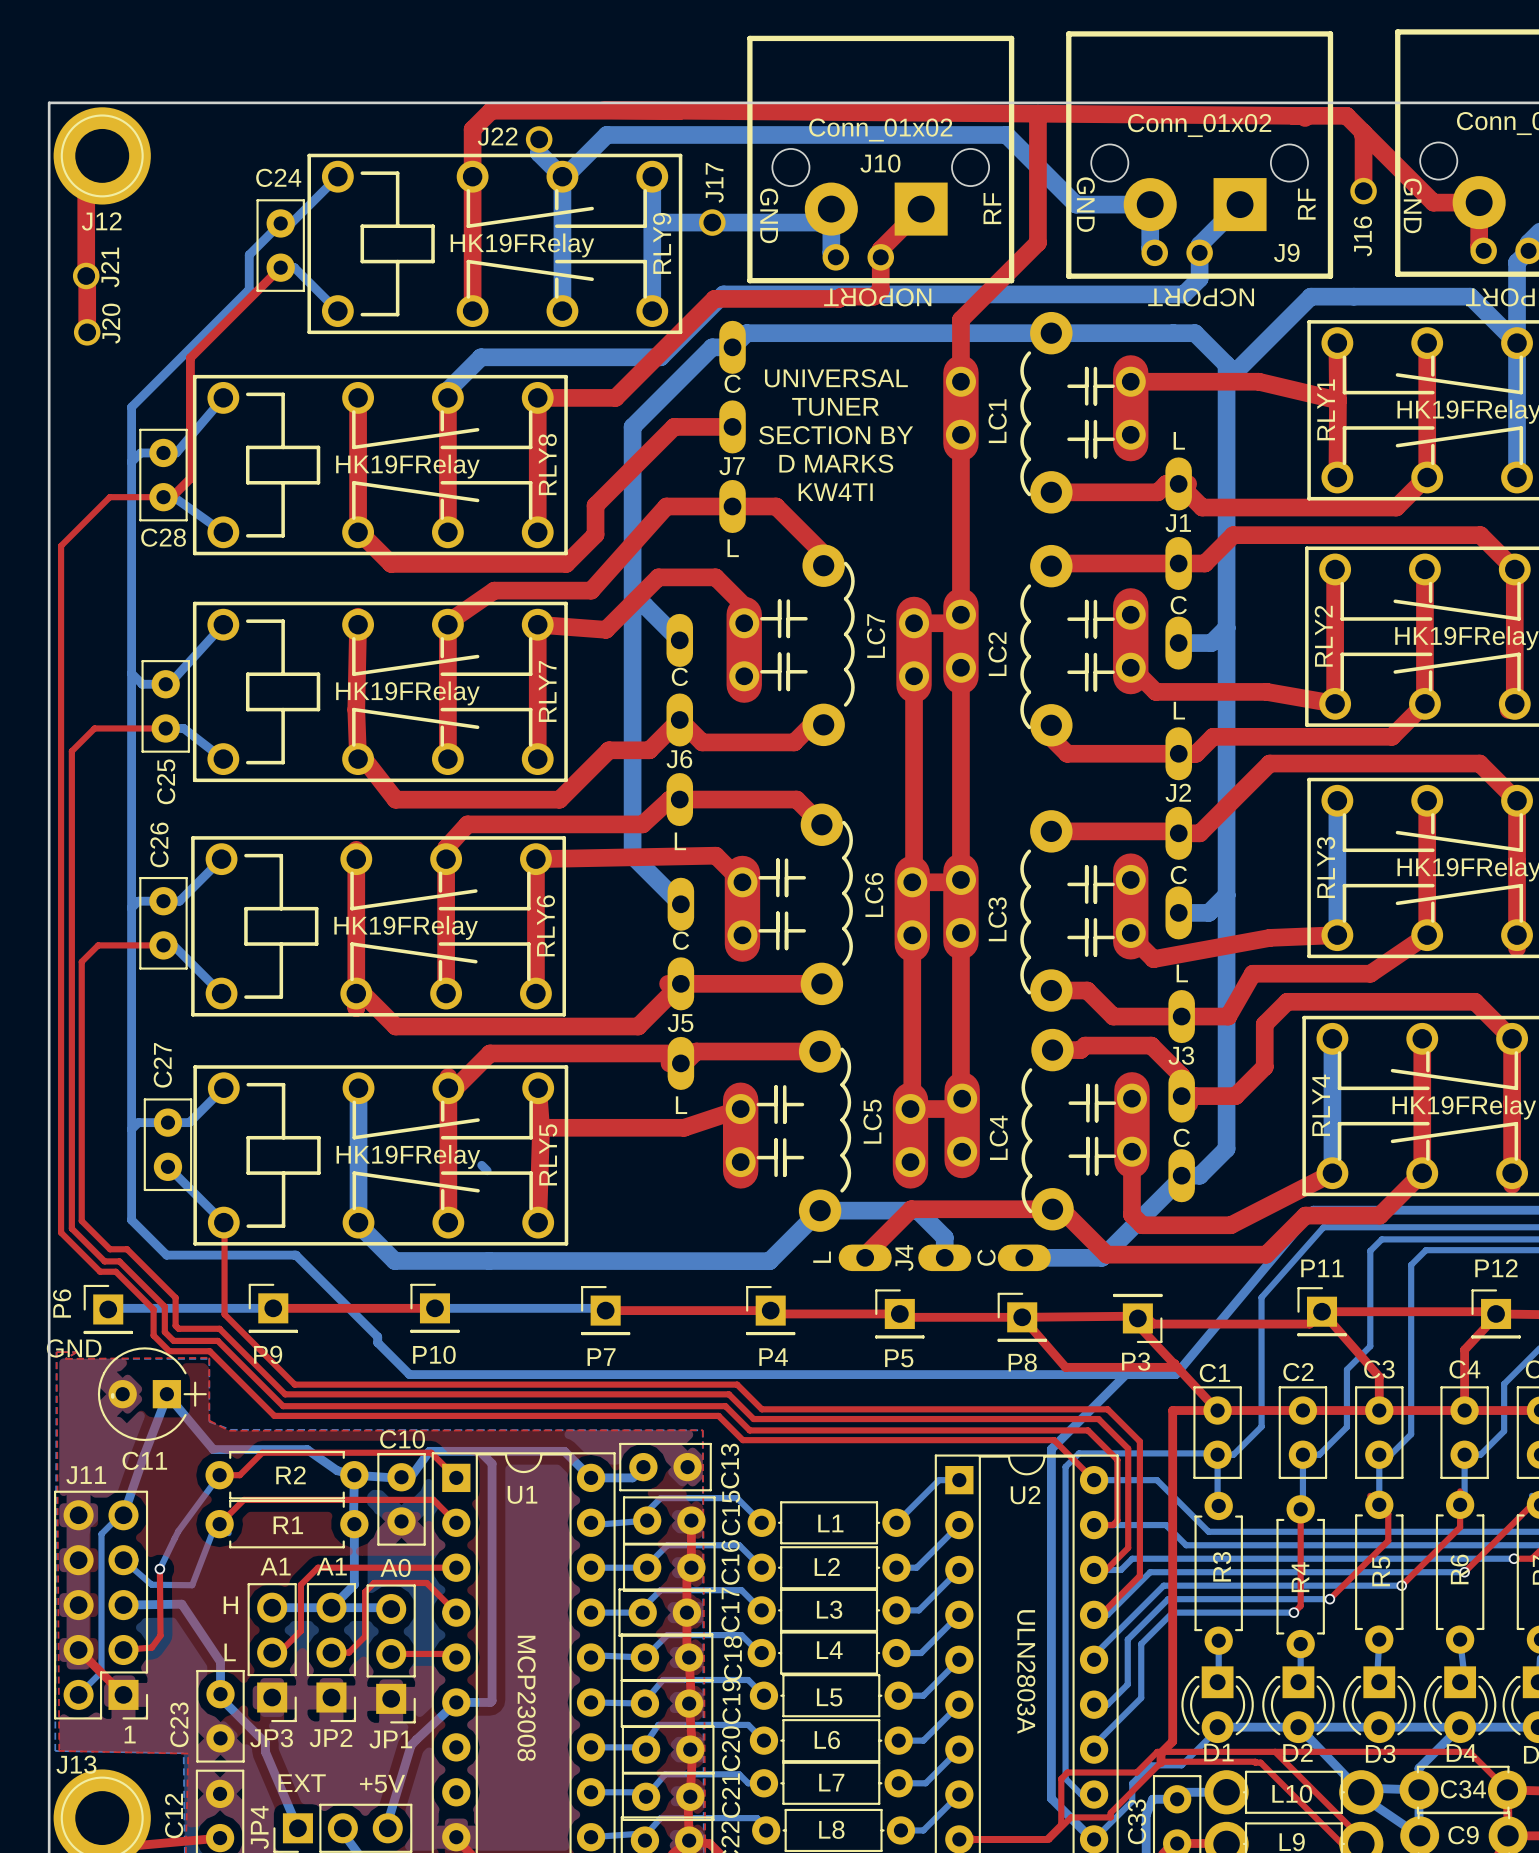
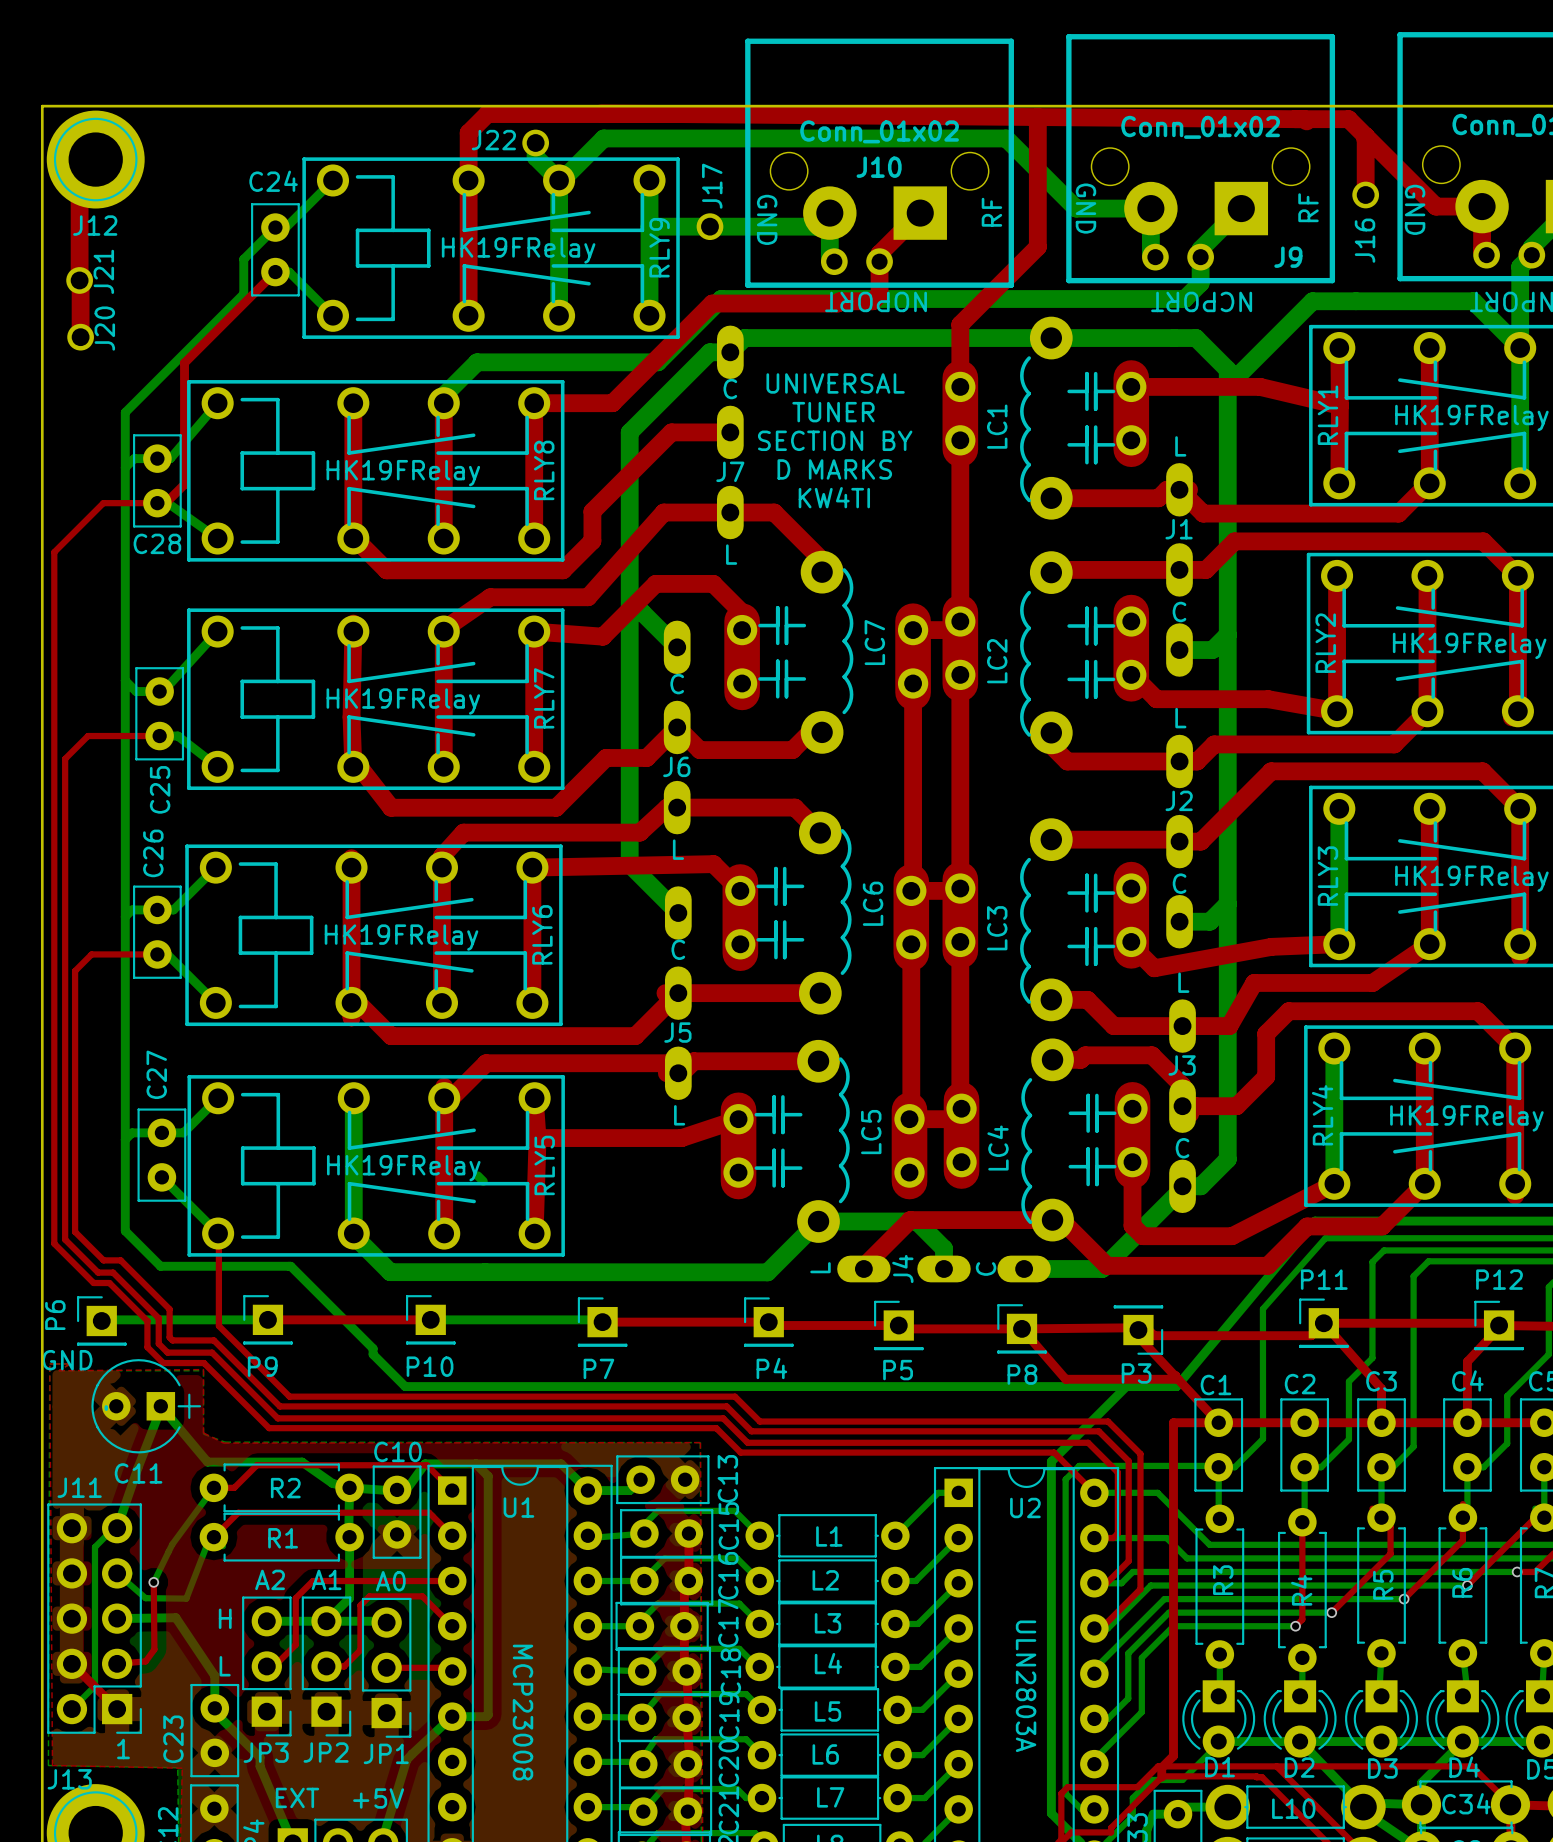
text: A1 (275, 1566) -> A2 (270, 1579)

